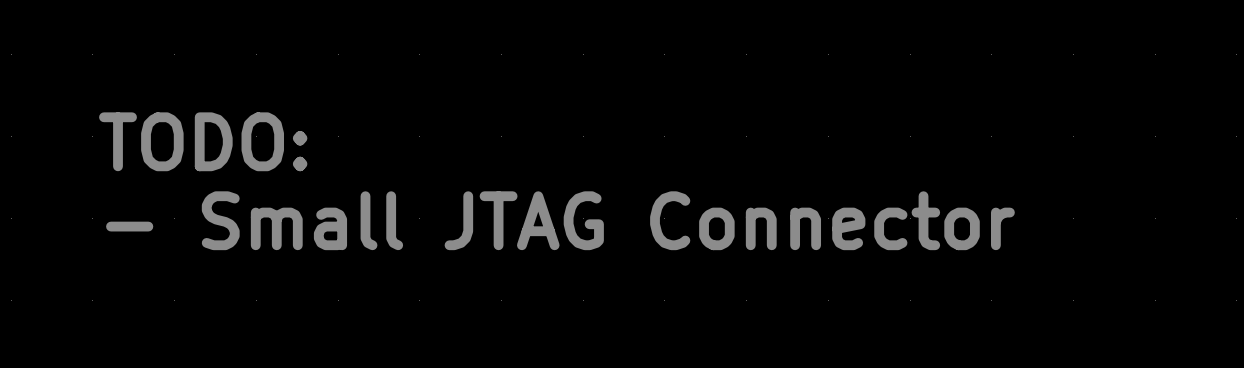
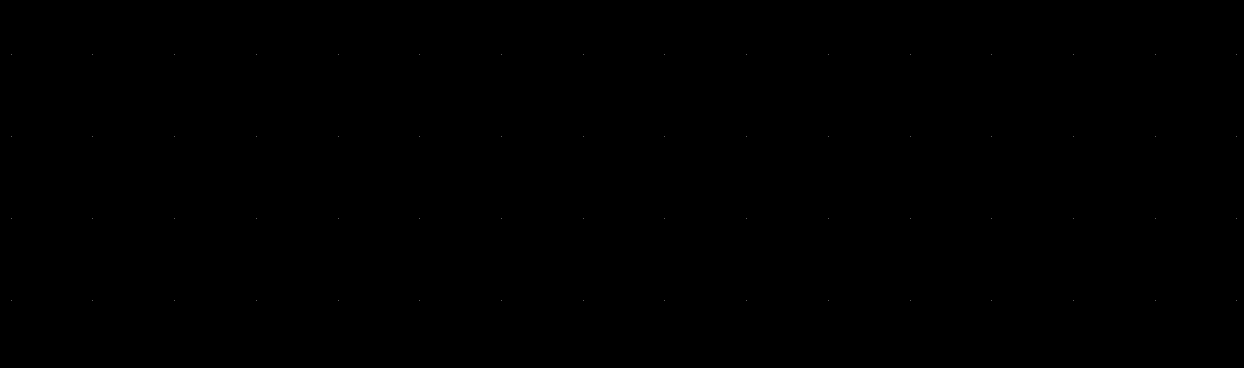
text: TODO: (203, 141) -> none
text: - Small JTAG Connector (560, 220) -> none

